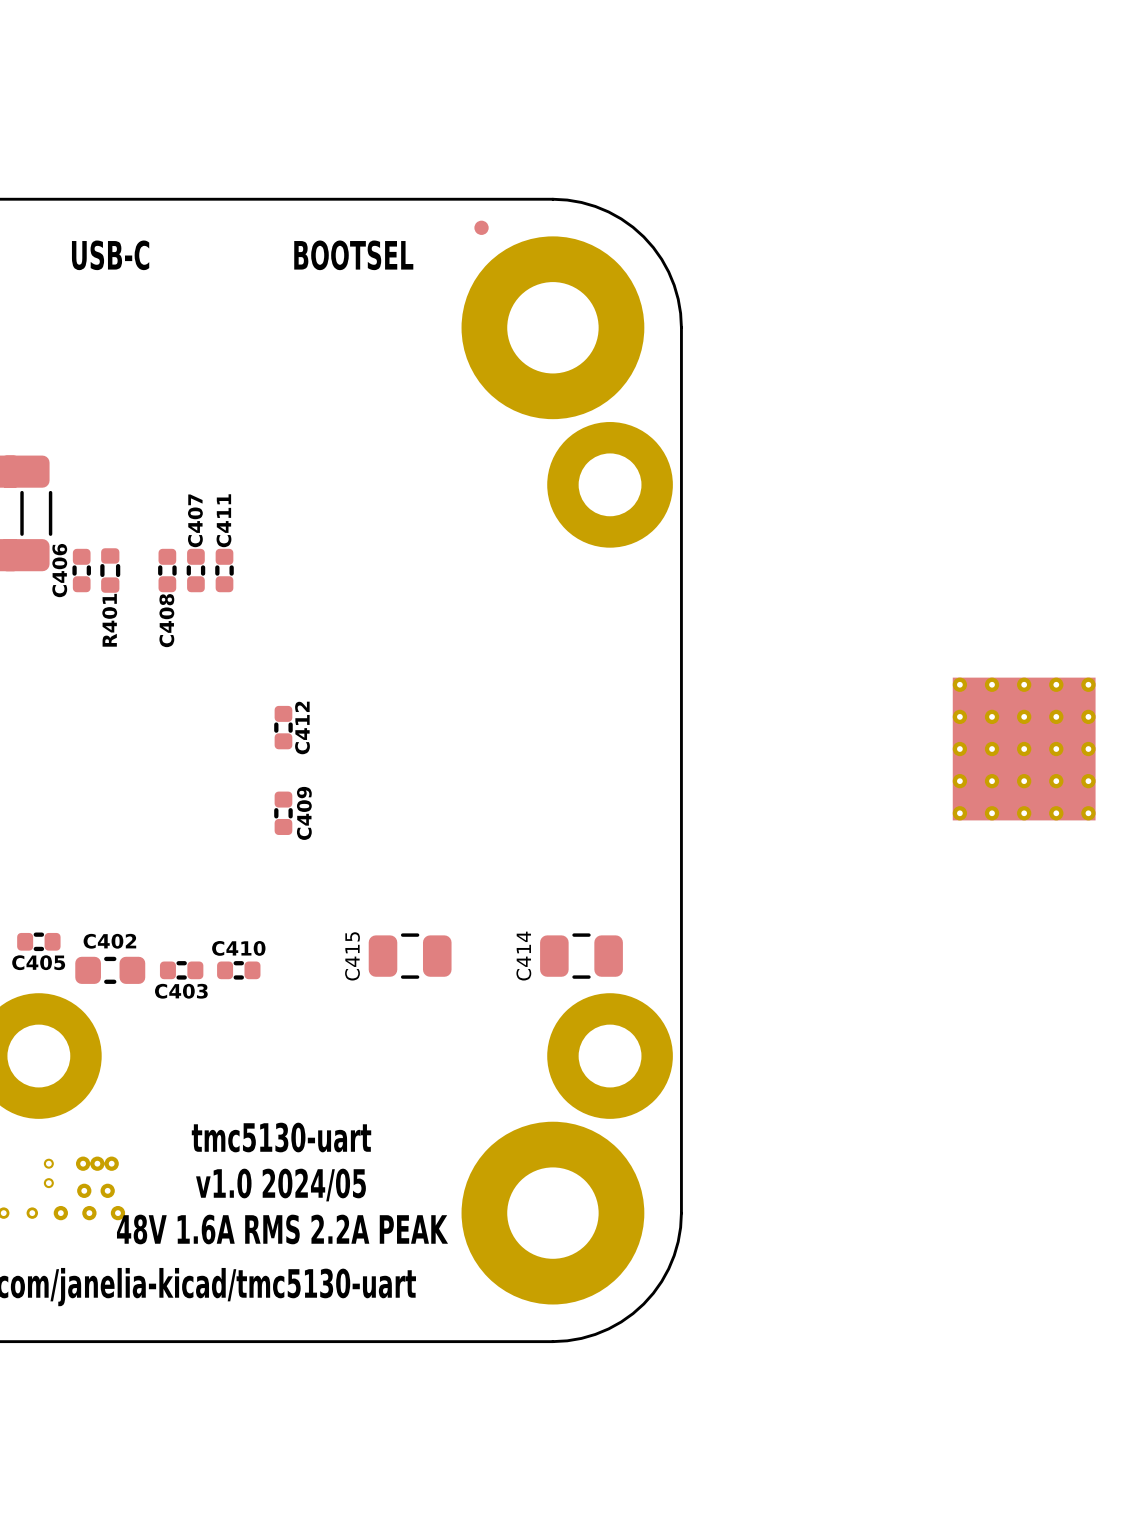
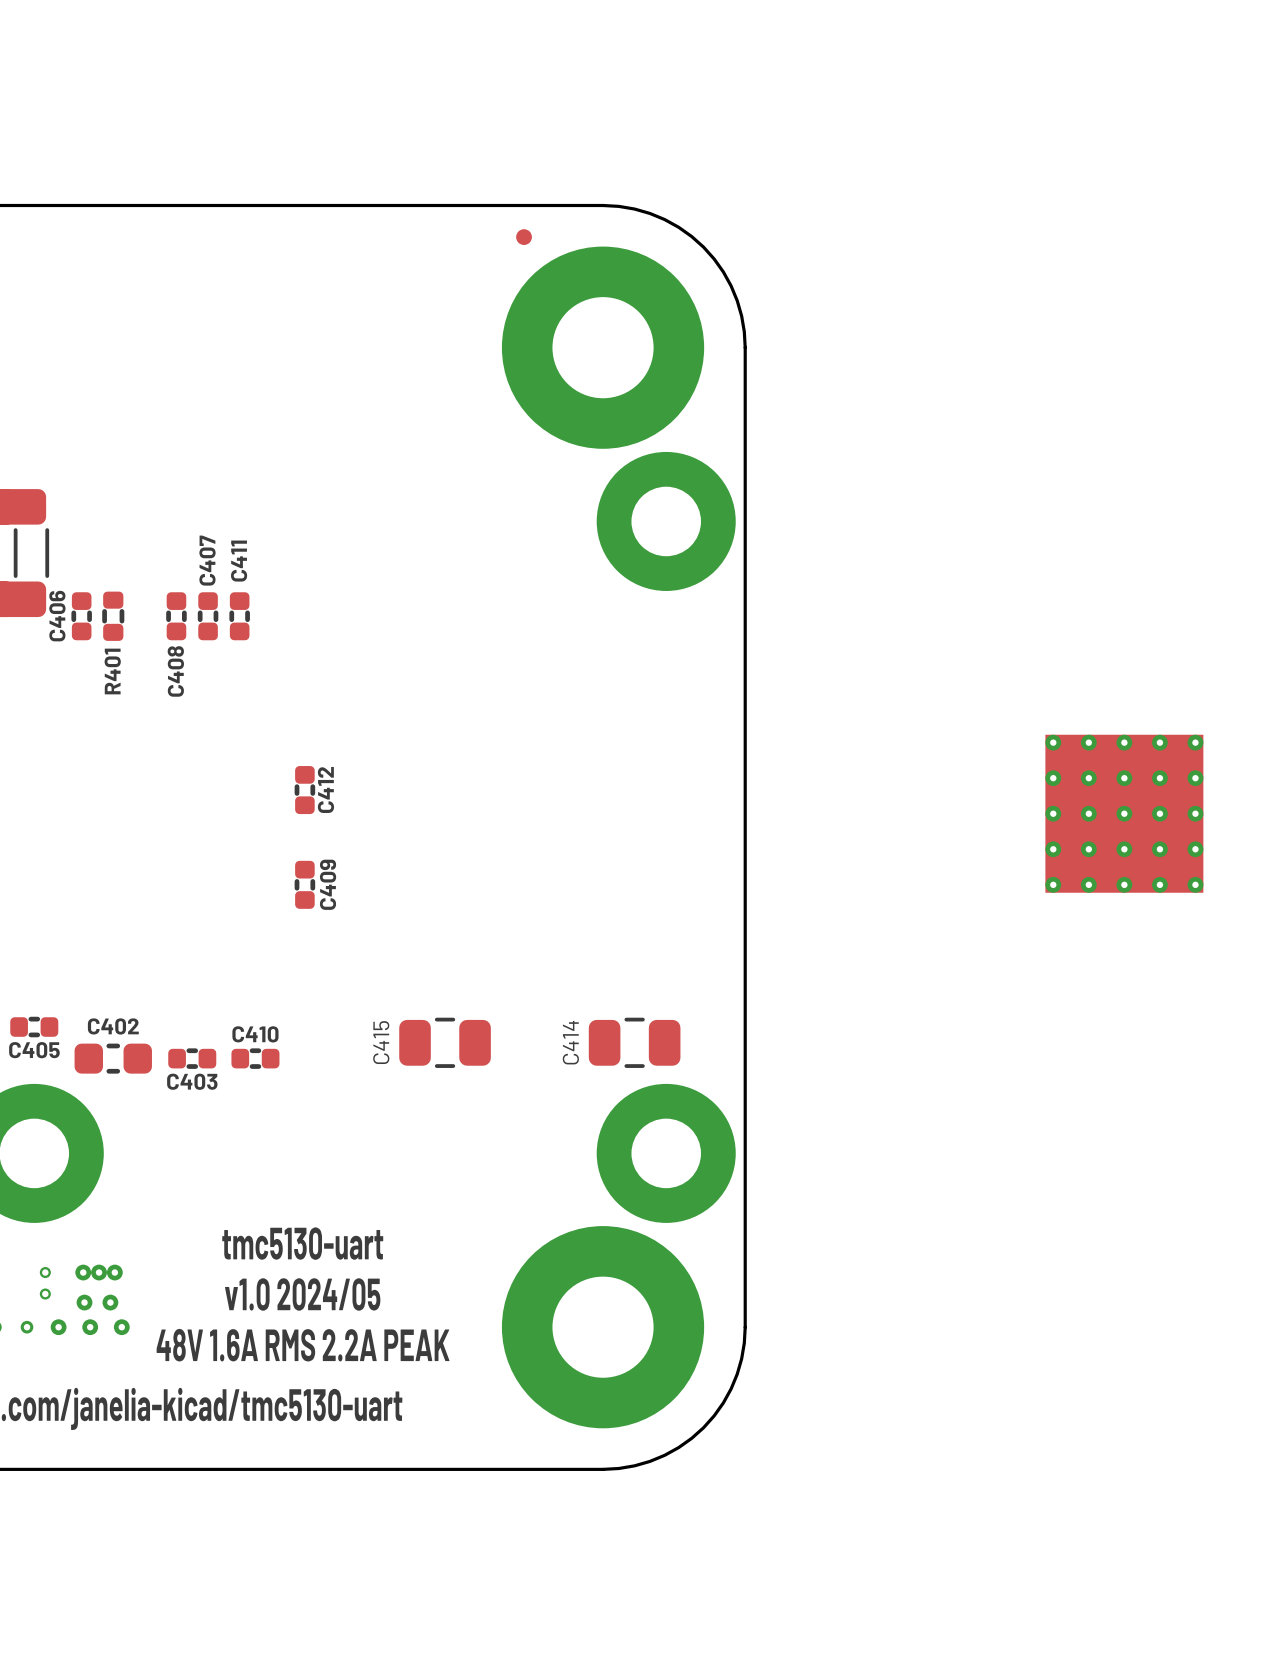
text: USB-C (110, 255) -> none
text: BOOTSEL (353, 255) -> none

